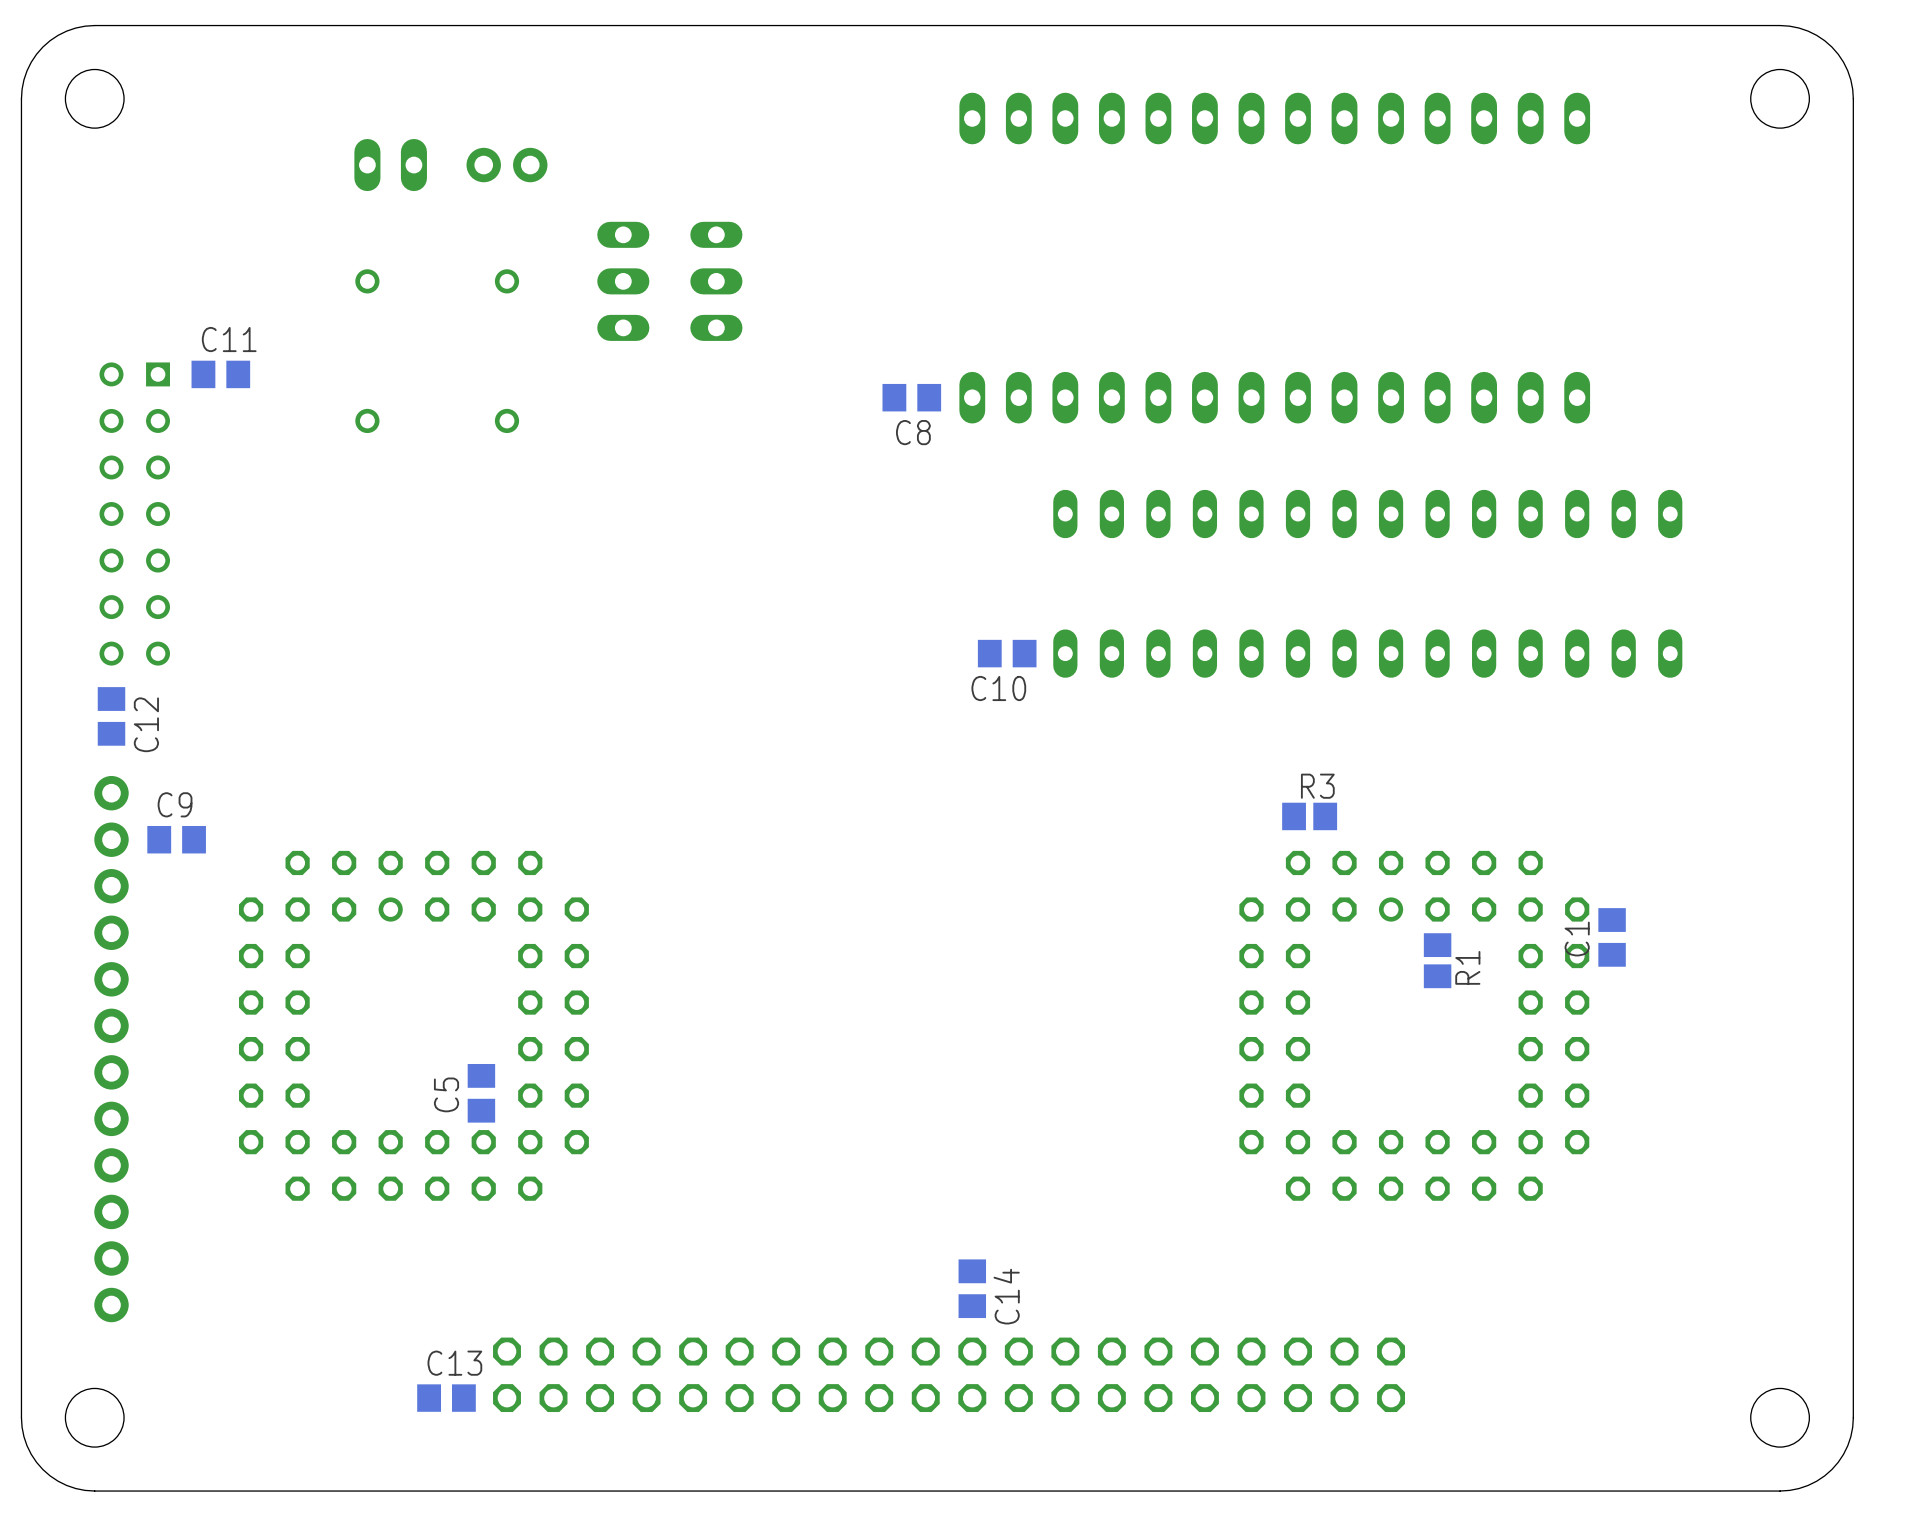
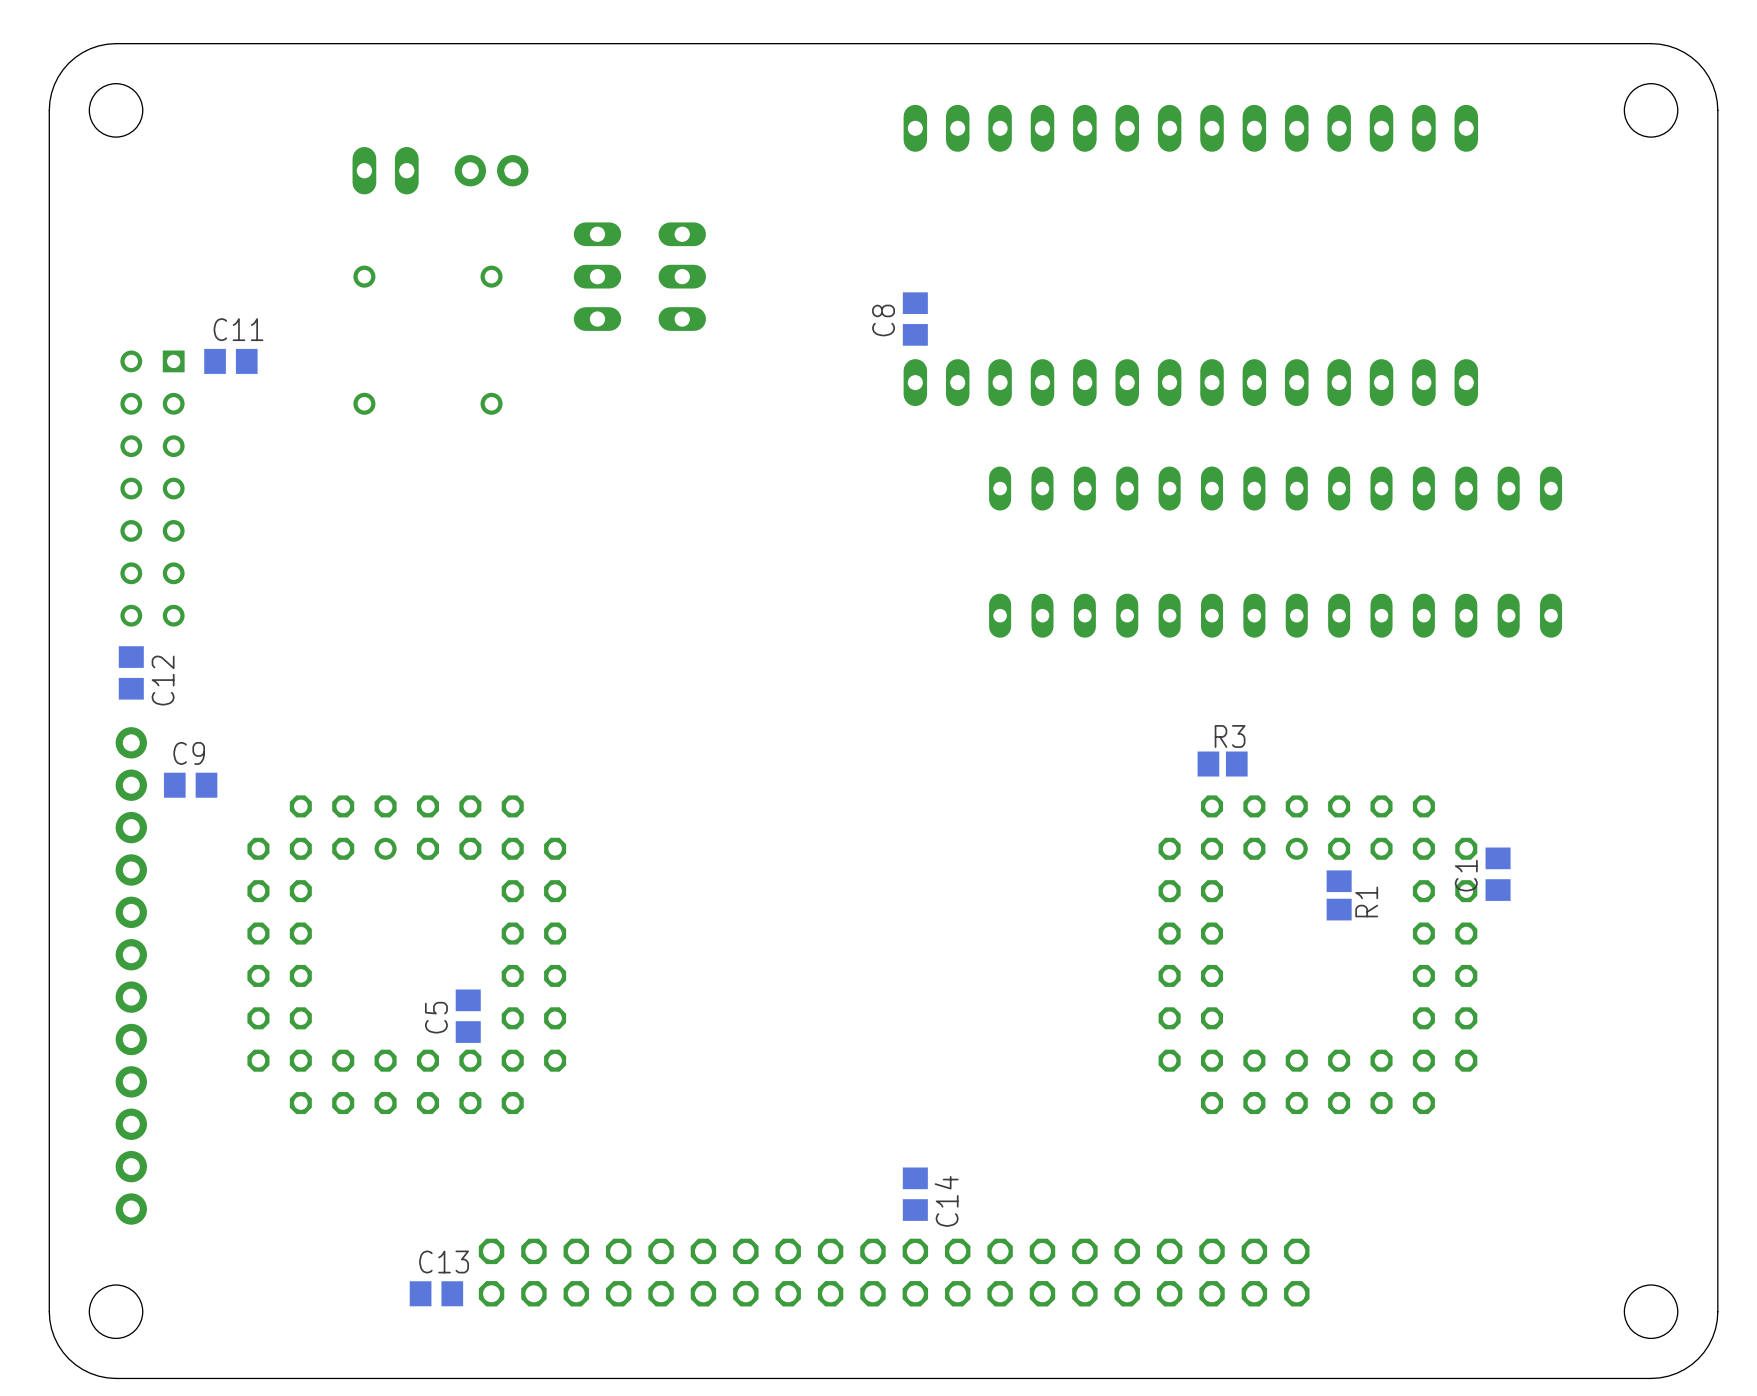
C8 rotation: 0° (911, 397) -> 90° clockwise (915, 319)
C8 position: (911, 397) -> (915, 319)
C10: (1007, 653) -> none

